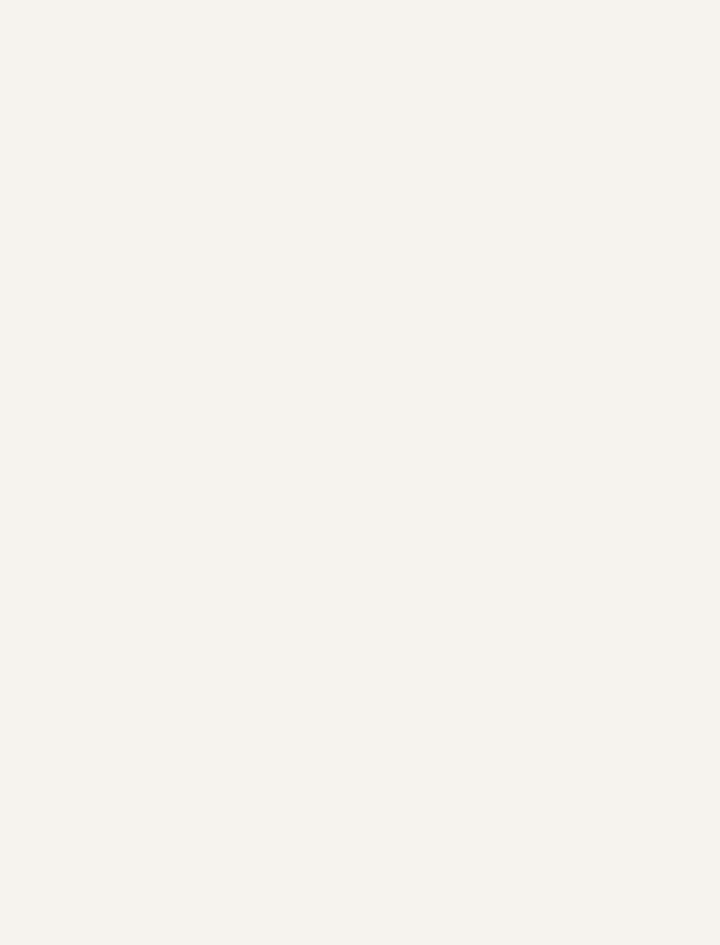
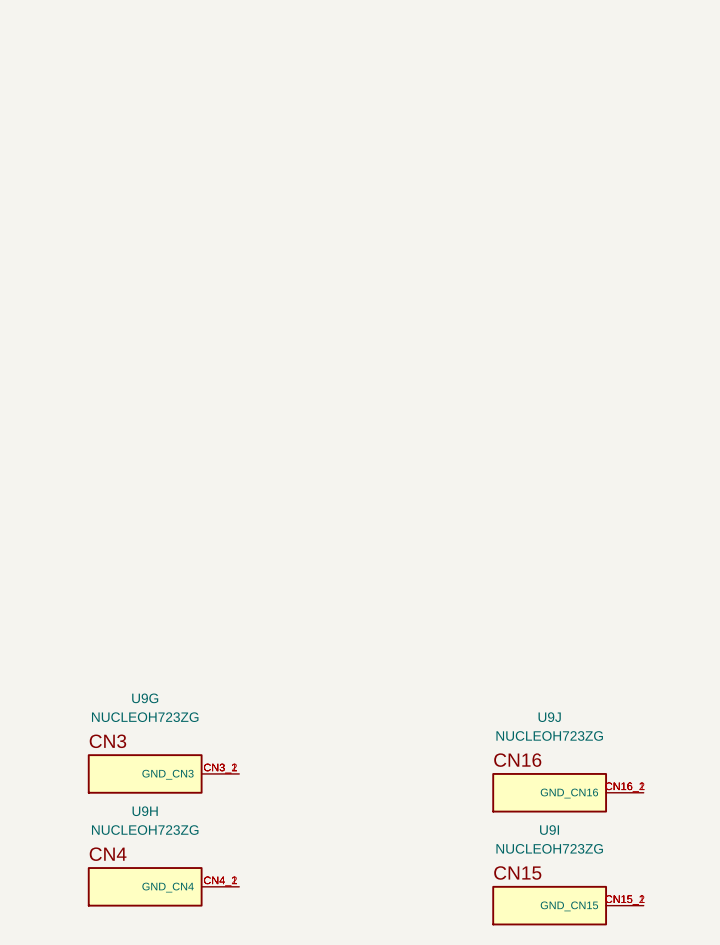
U9G: none -> NUCLEOH723ZG (163, 773)
U9J: none -> NUCLEOH723ZG (567, 792)
U9H: none -> NUCLEOH723ZG (163, 886)
U9I: none -> NUCLEOH723ZG (567, 905)

